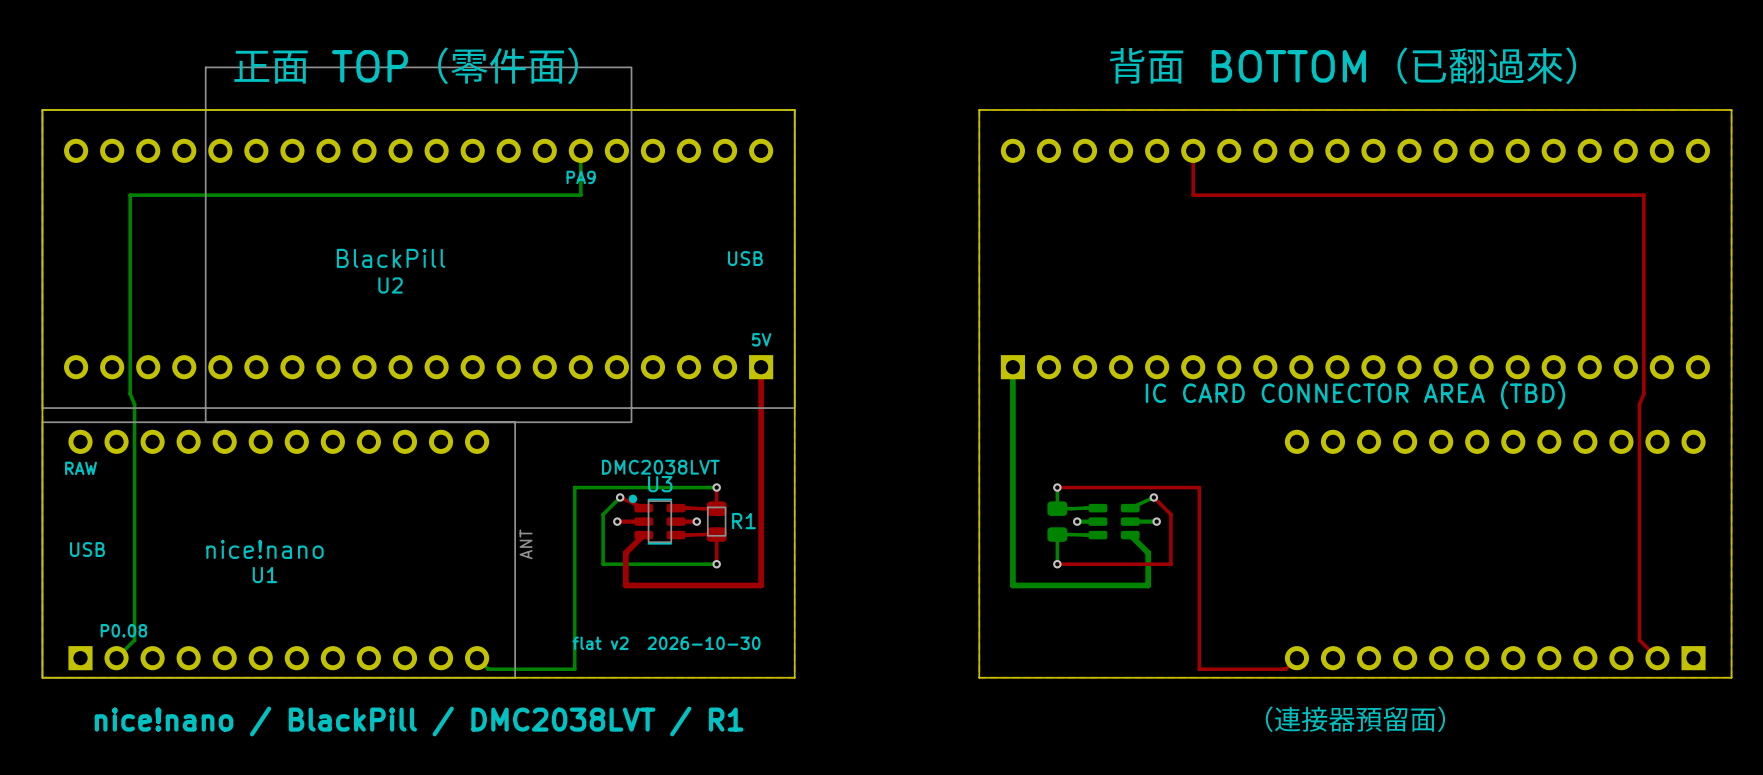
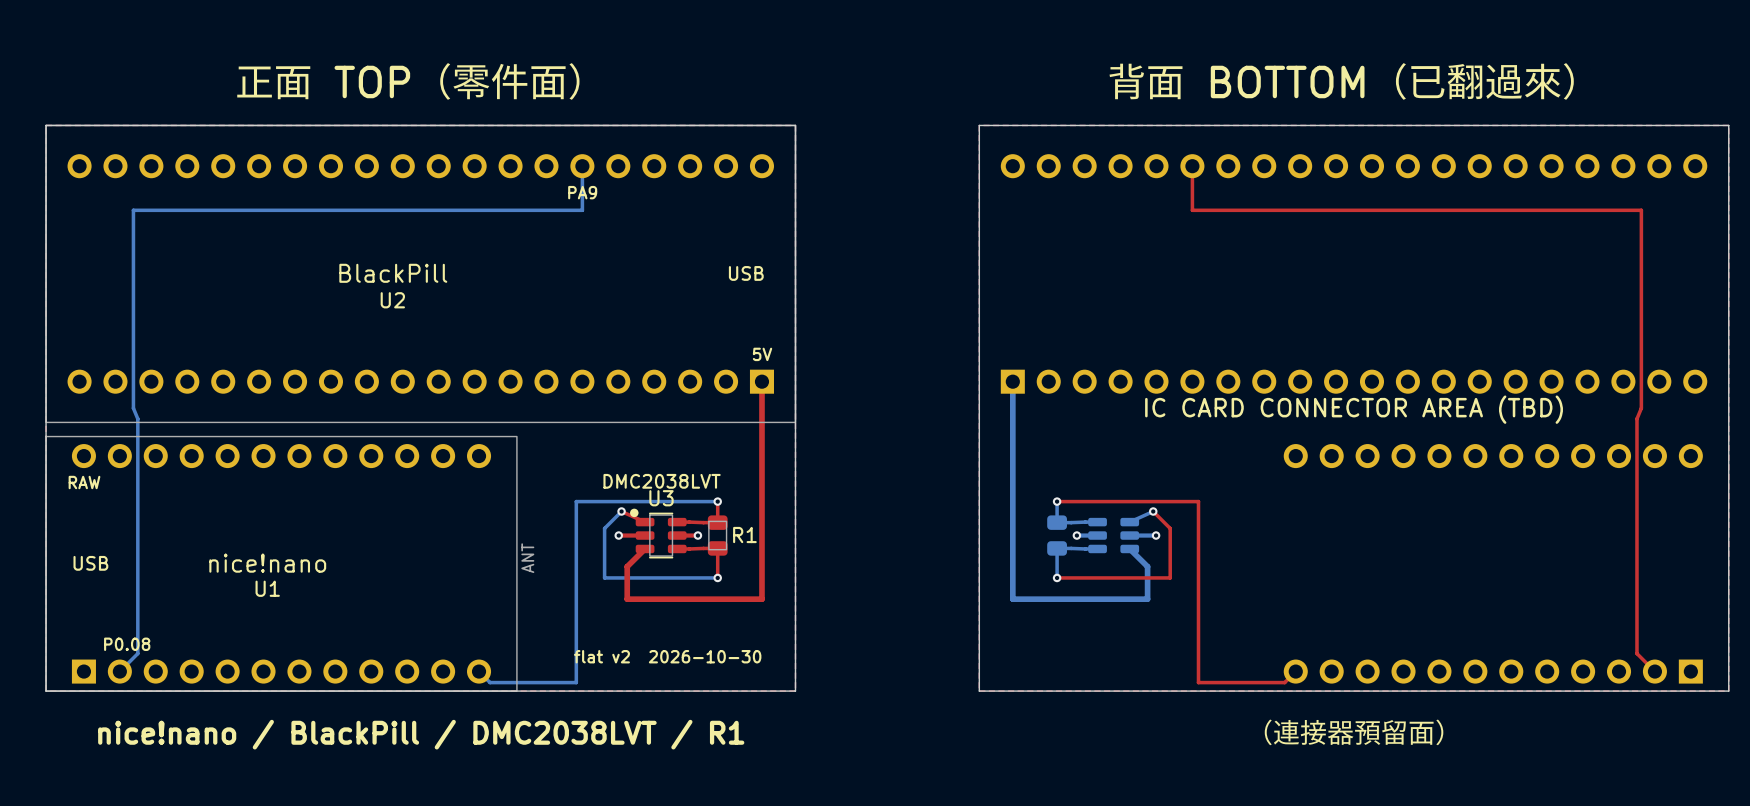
drawing: [204, 66, 633, 423] -> none

